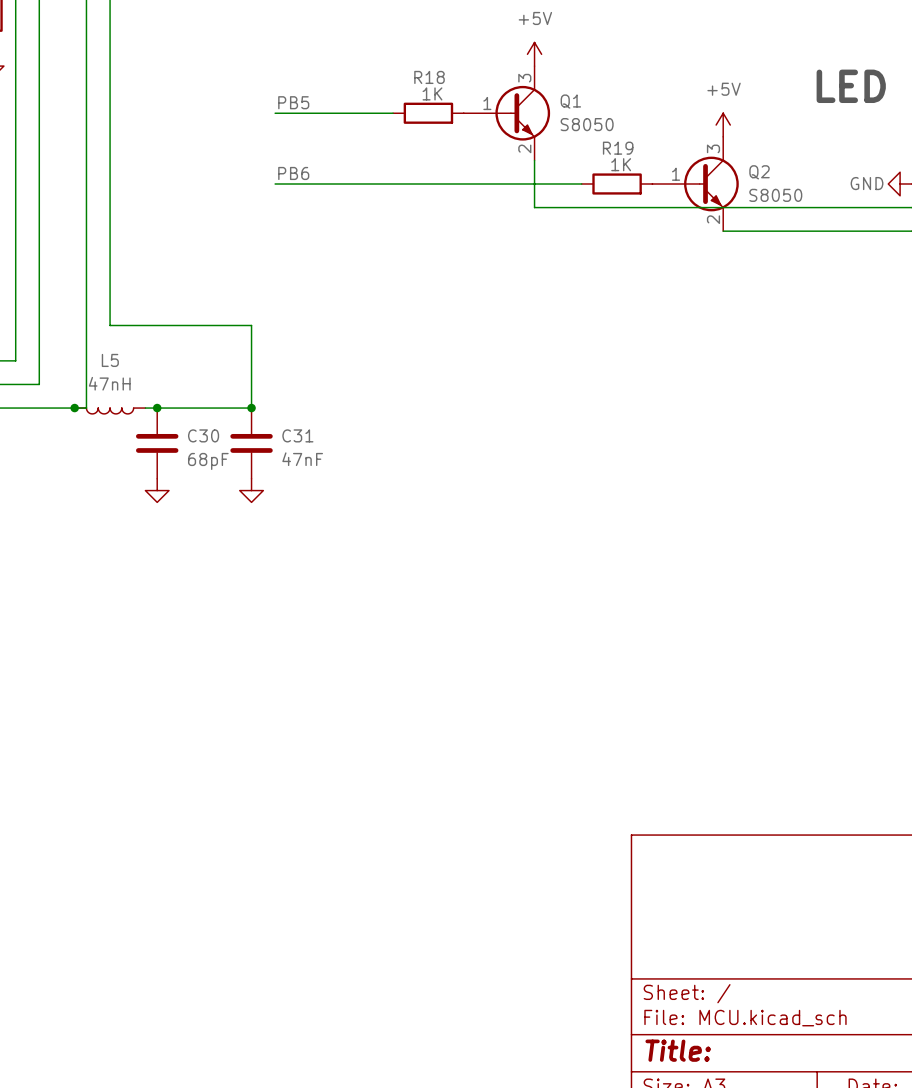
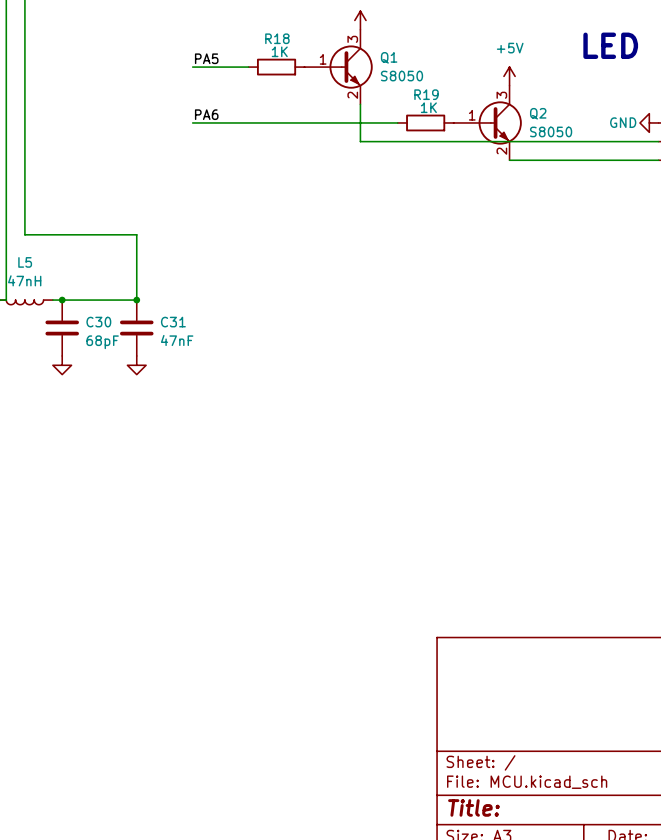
label: PB5 (293, 102) -> none
label: none -> PA5 (206, 58)
wire: (275, 113) (322, 113) -> none
label: PB6 (293, 173) -> none
label: none -> PA6 (206, 114)
wire: (275, 184) (322, 184) -> none

